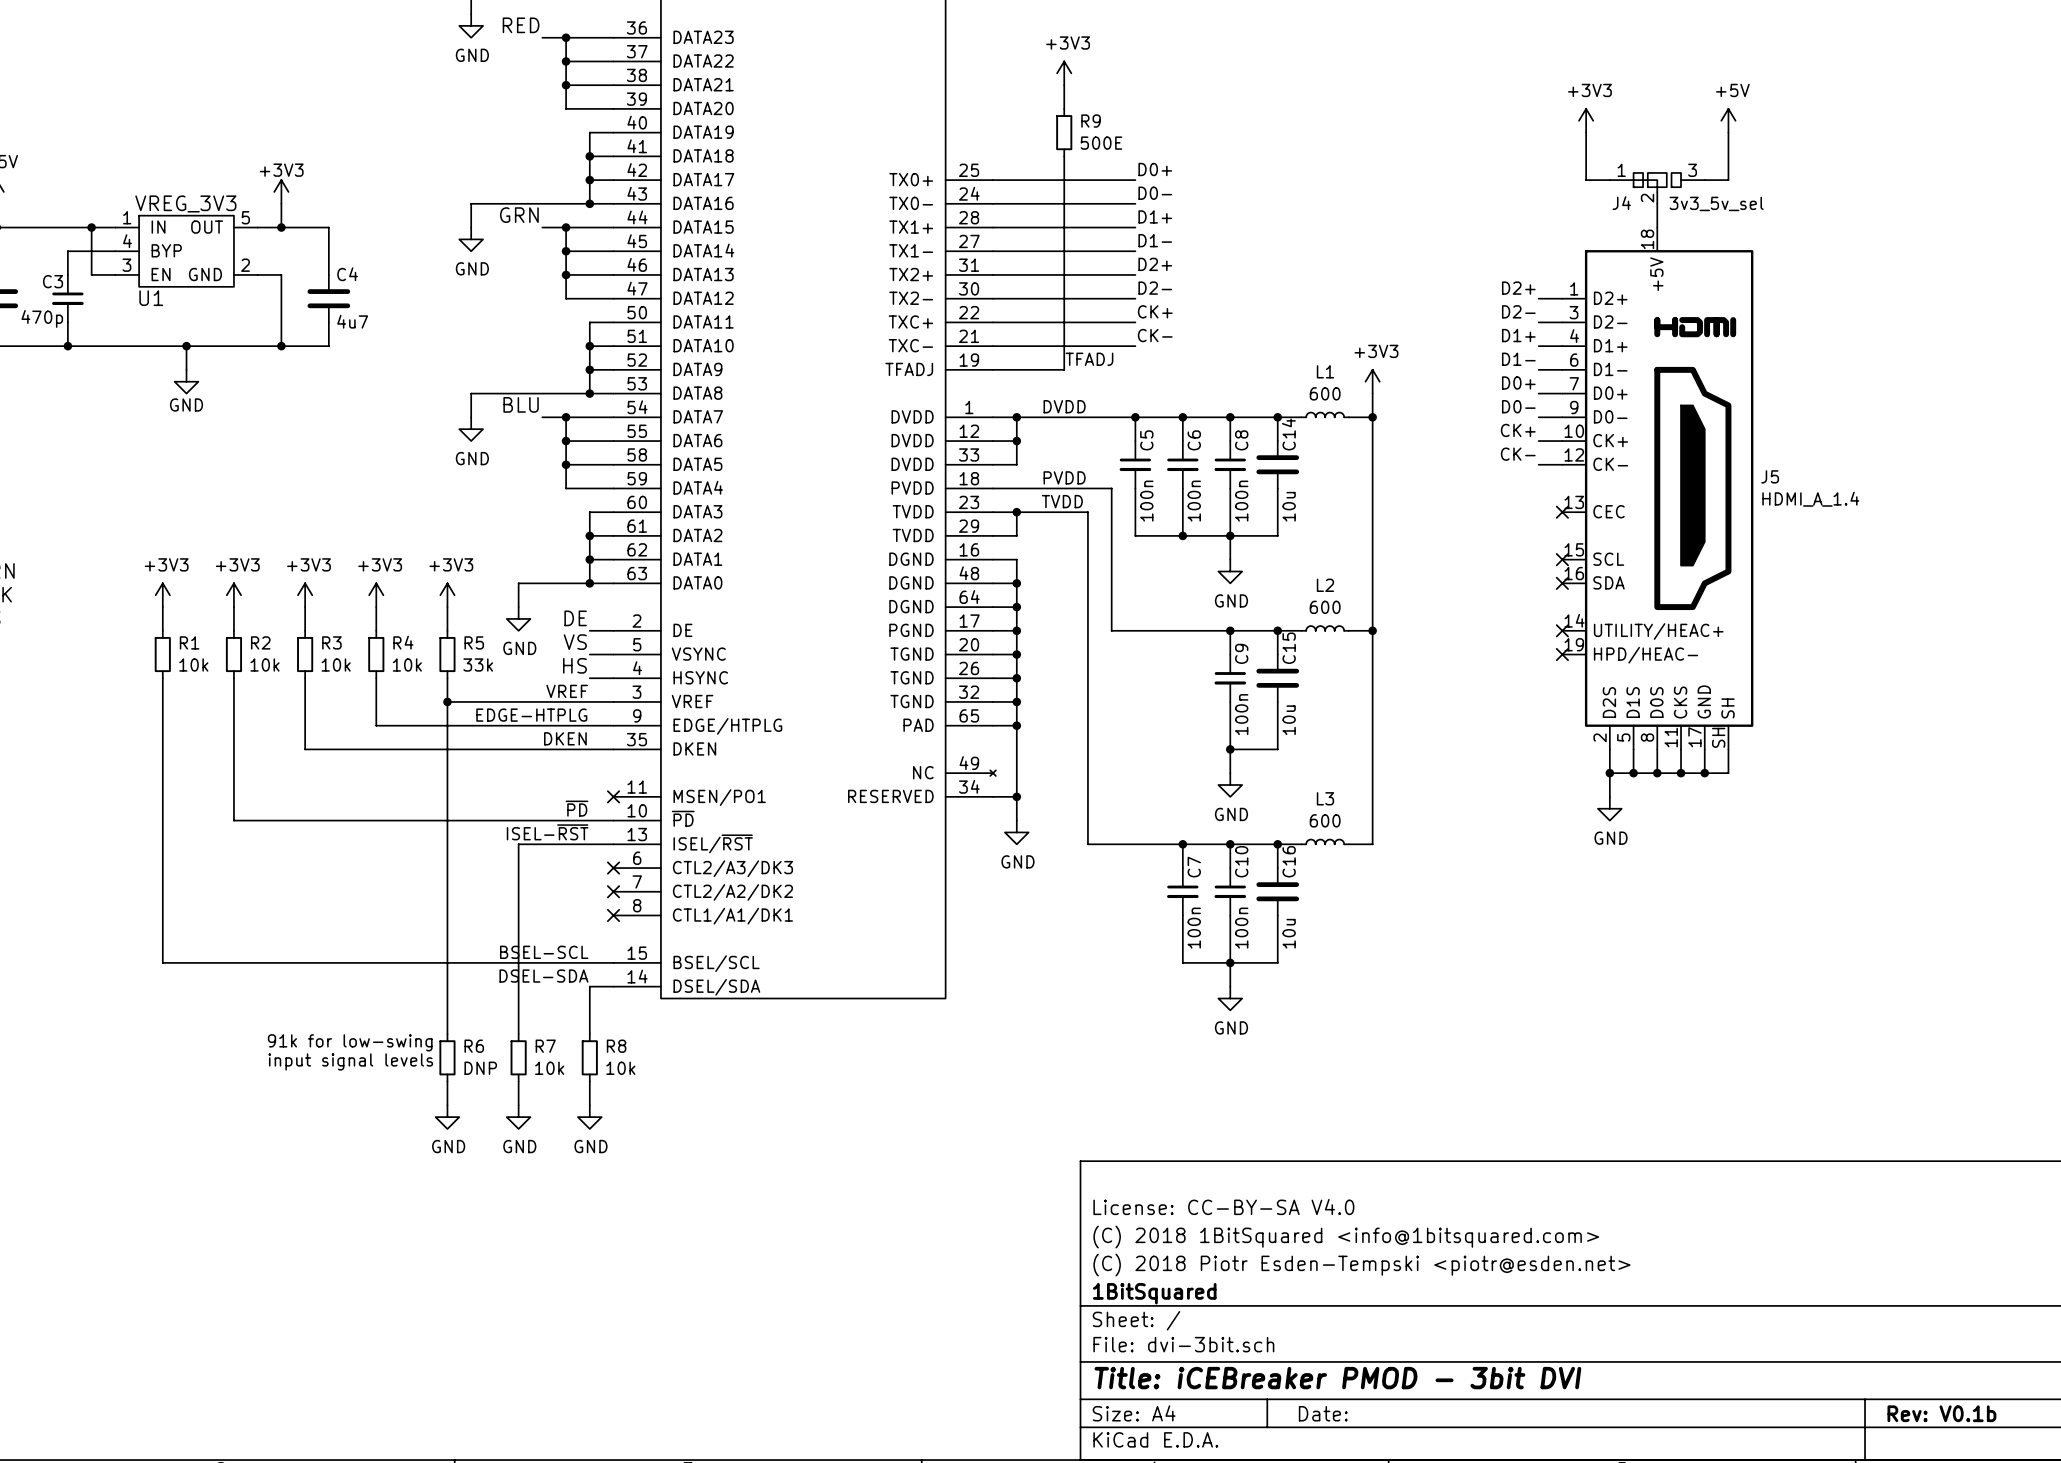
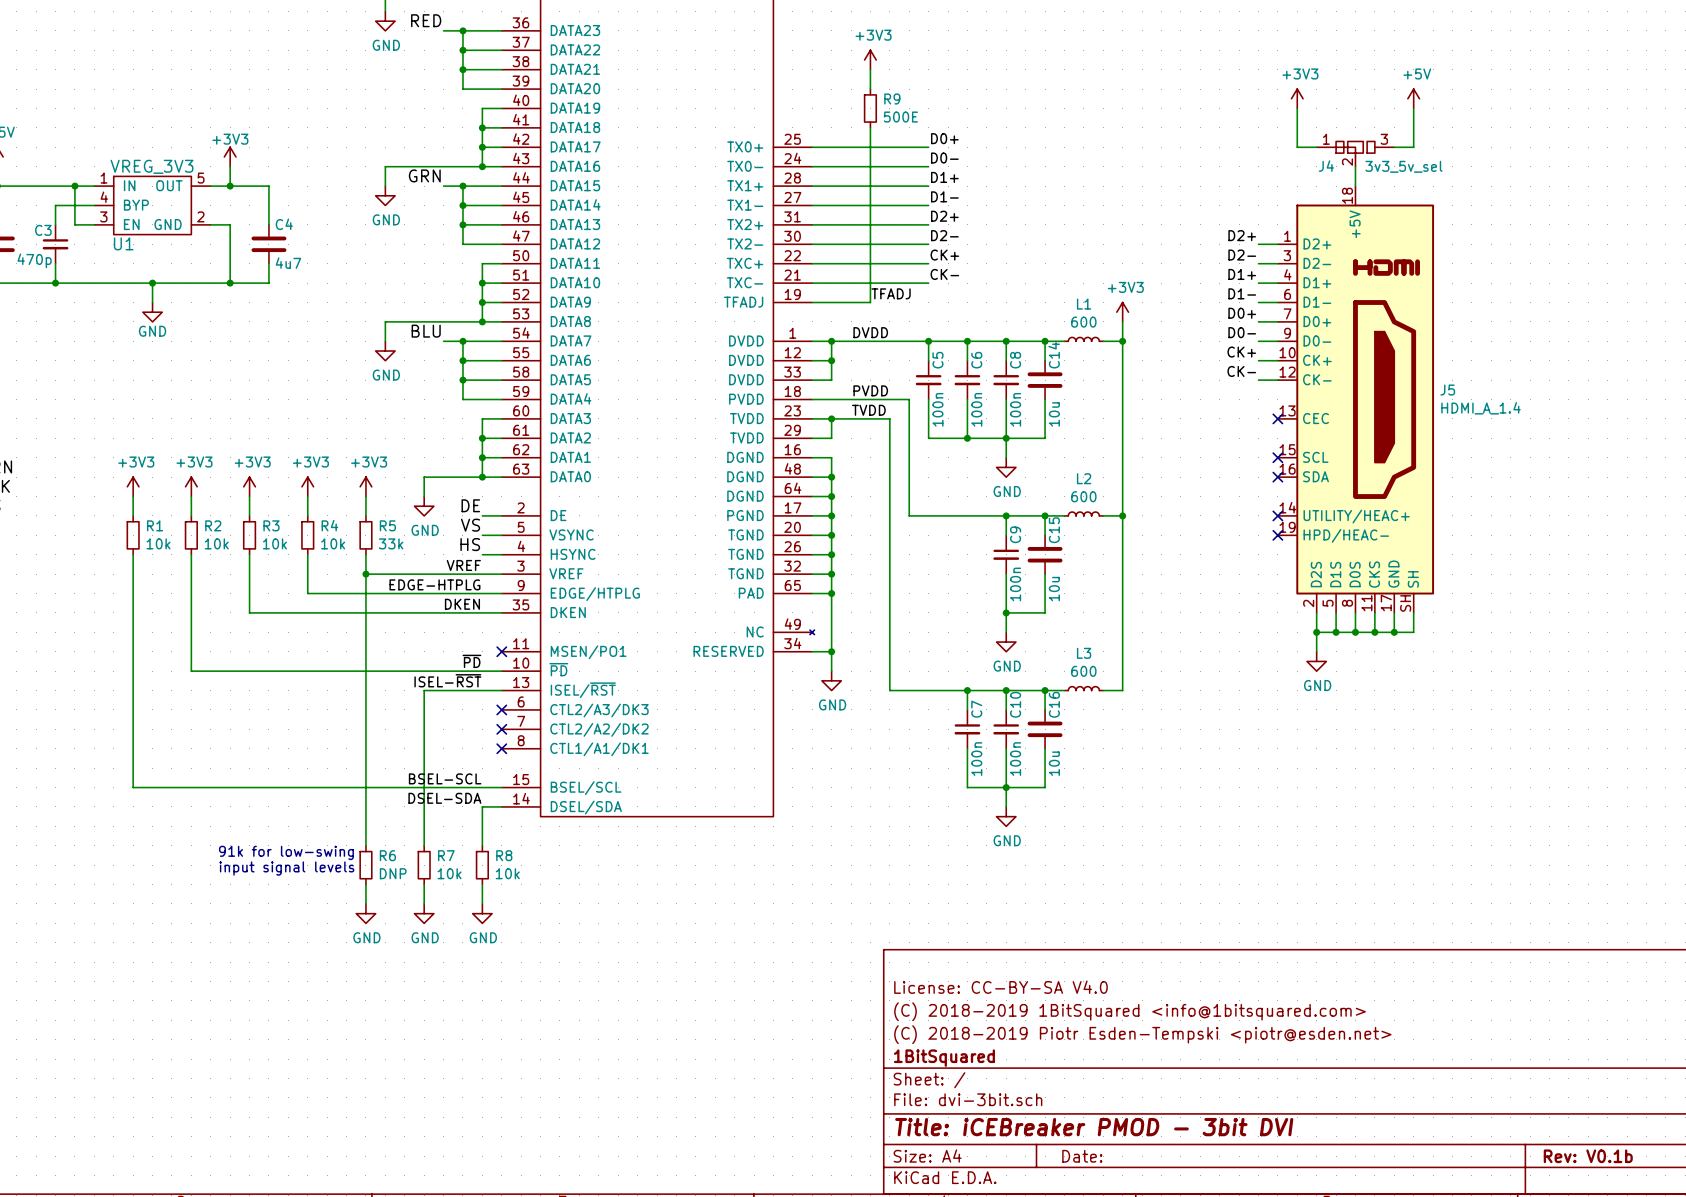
title block: (C) 2018 1BitSquared <info@1bitsquared.com> (1346, 1237) -> (C) 2018-2019 1BitSquared <info@1bitsquared.com> (1130, 1011)
title block: (C) 2018 Piotr Esden-Tempski <piotr@esden.net> (1361, 1265) -> (C) 2018-2019 Piotr Esden-Tempski <piotr@esden.net> (1142, 1034)

